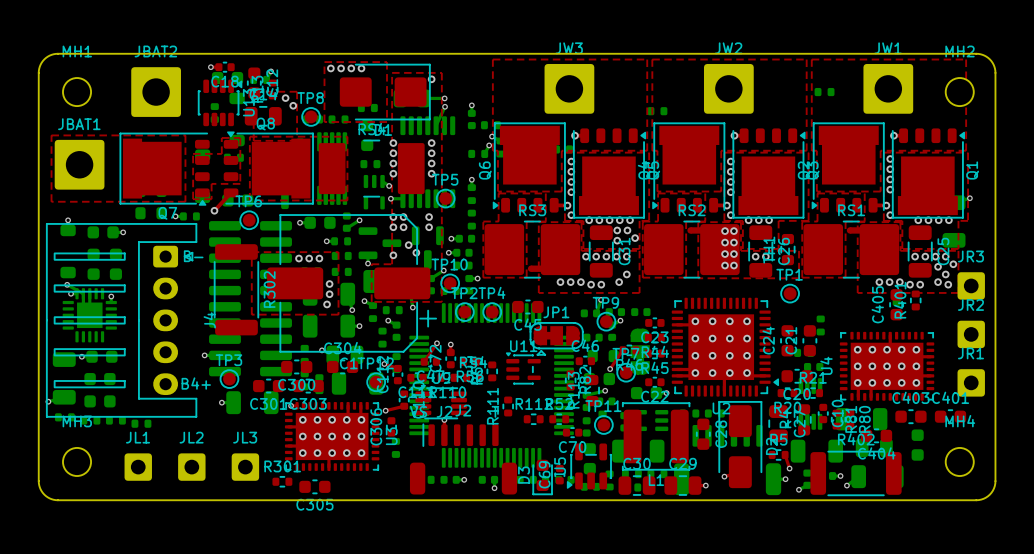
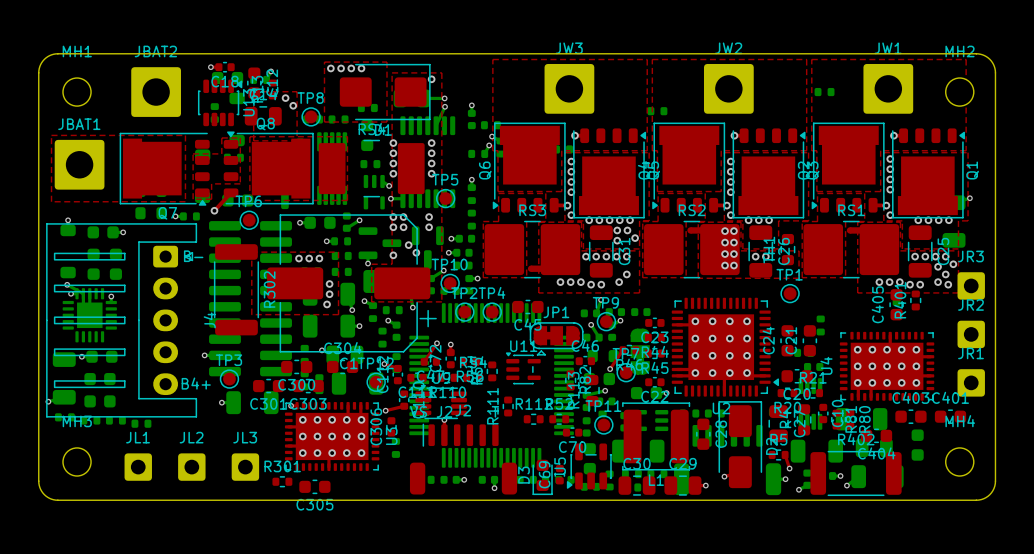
bottom track: none -> (591, 324) (599, 337)
via: none -> (591, 324)

